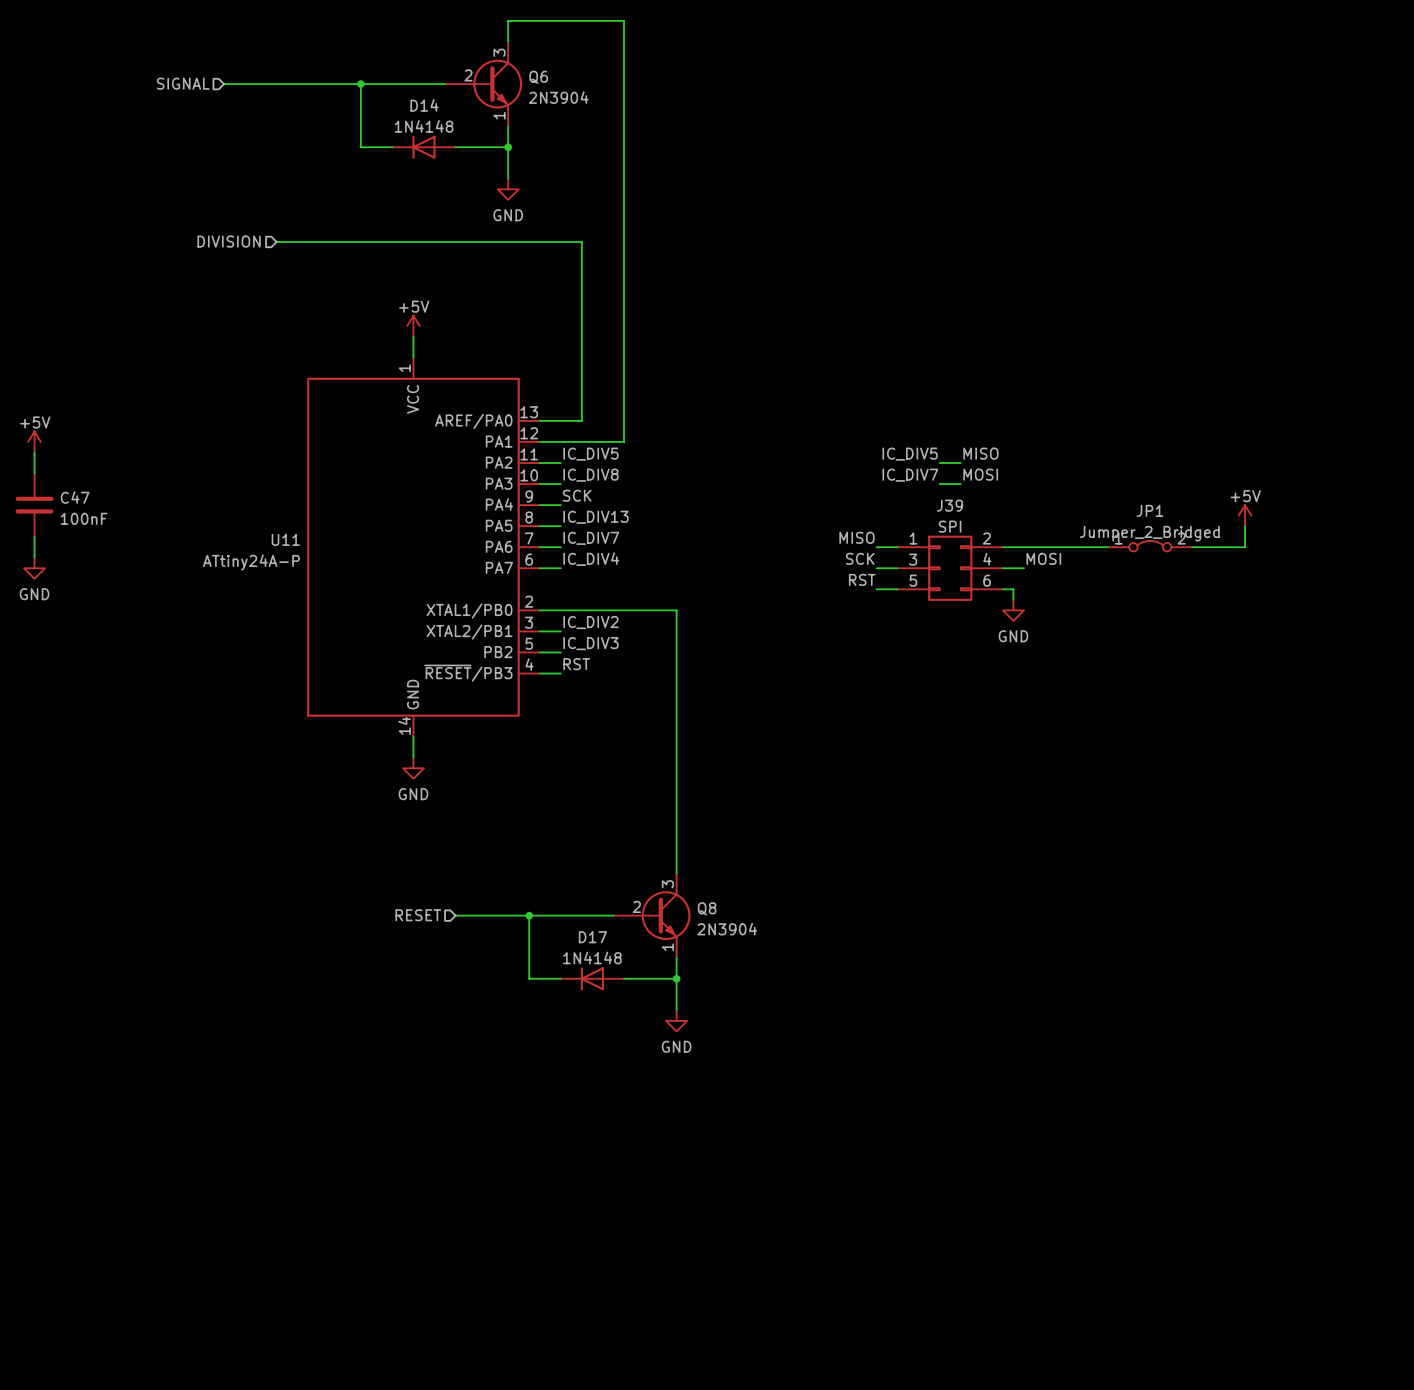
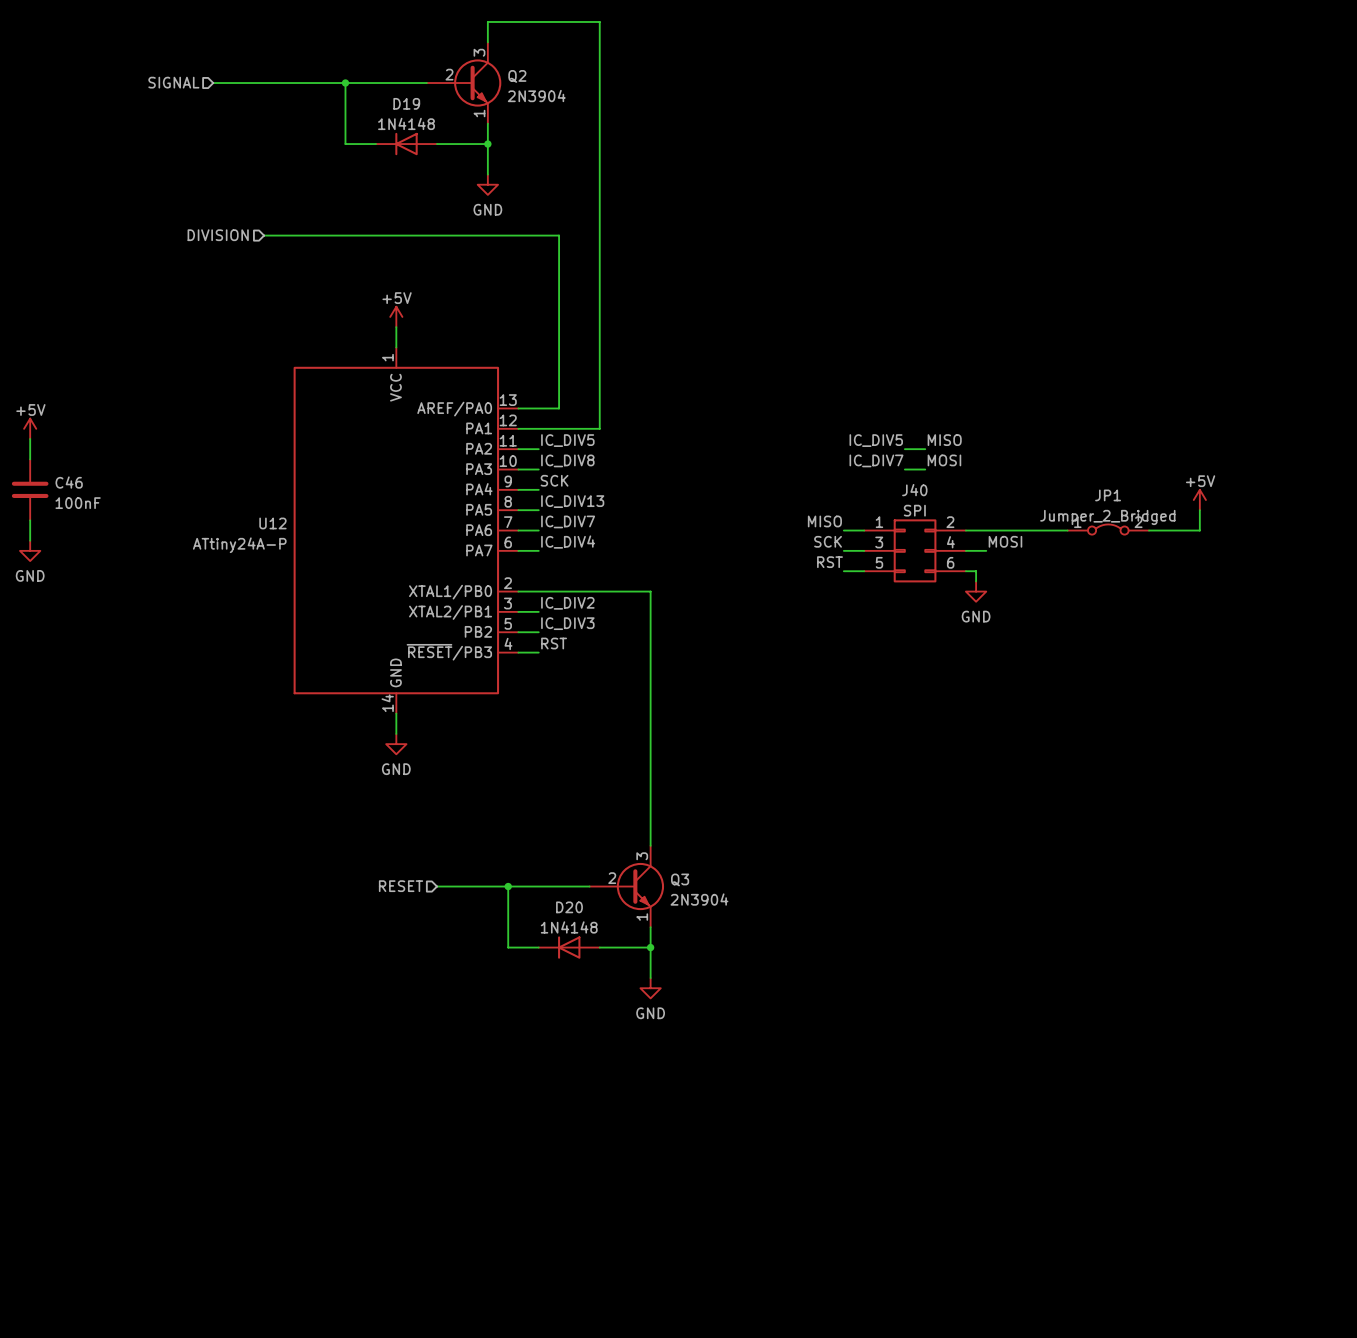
Q6 name: Q6 (538, 77) -> Q2 (517, 76)
D14 name: D14 (424, 105) -> D19 (406, 103)
C47 name: C47 (75, 497) -> C46 (69, 482)
J39 name: J39 (950, 505) -> J40 (914, 490)
U11 name: U11 (285, 539) -> U12 (272, 523)
Q8 name: Q8 (707, 908) -> Q3 (680, 879)
D17 name: D17 (592, 937) -> D20 (569, 907)

